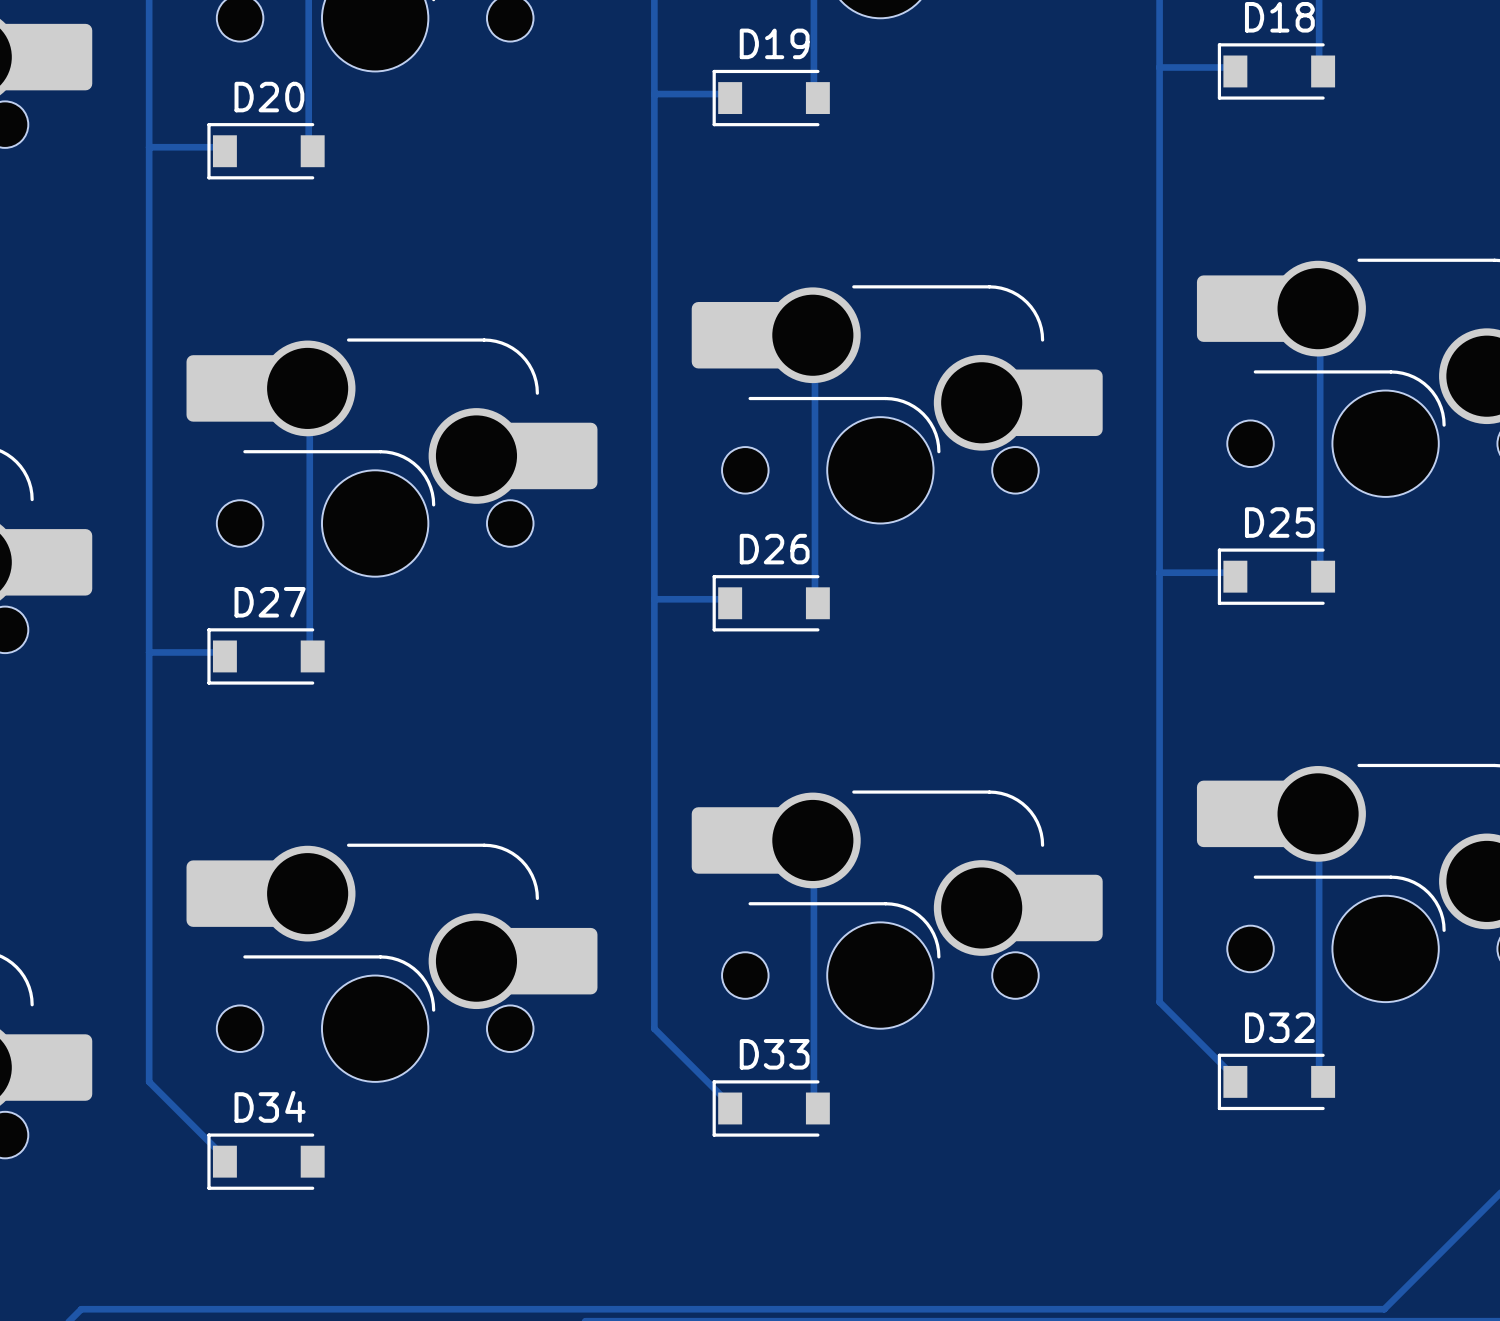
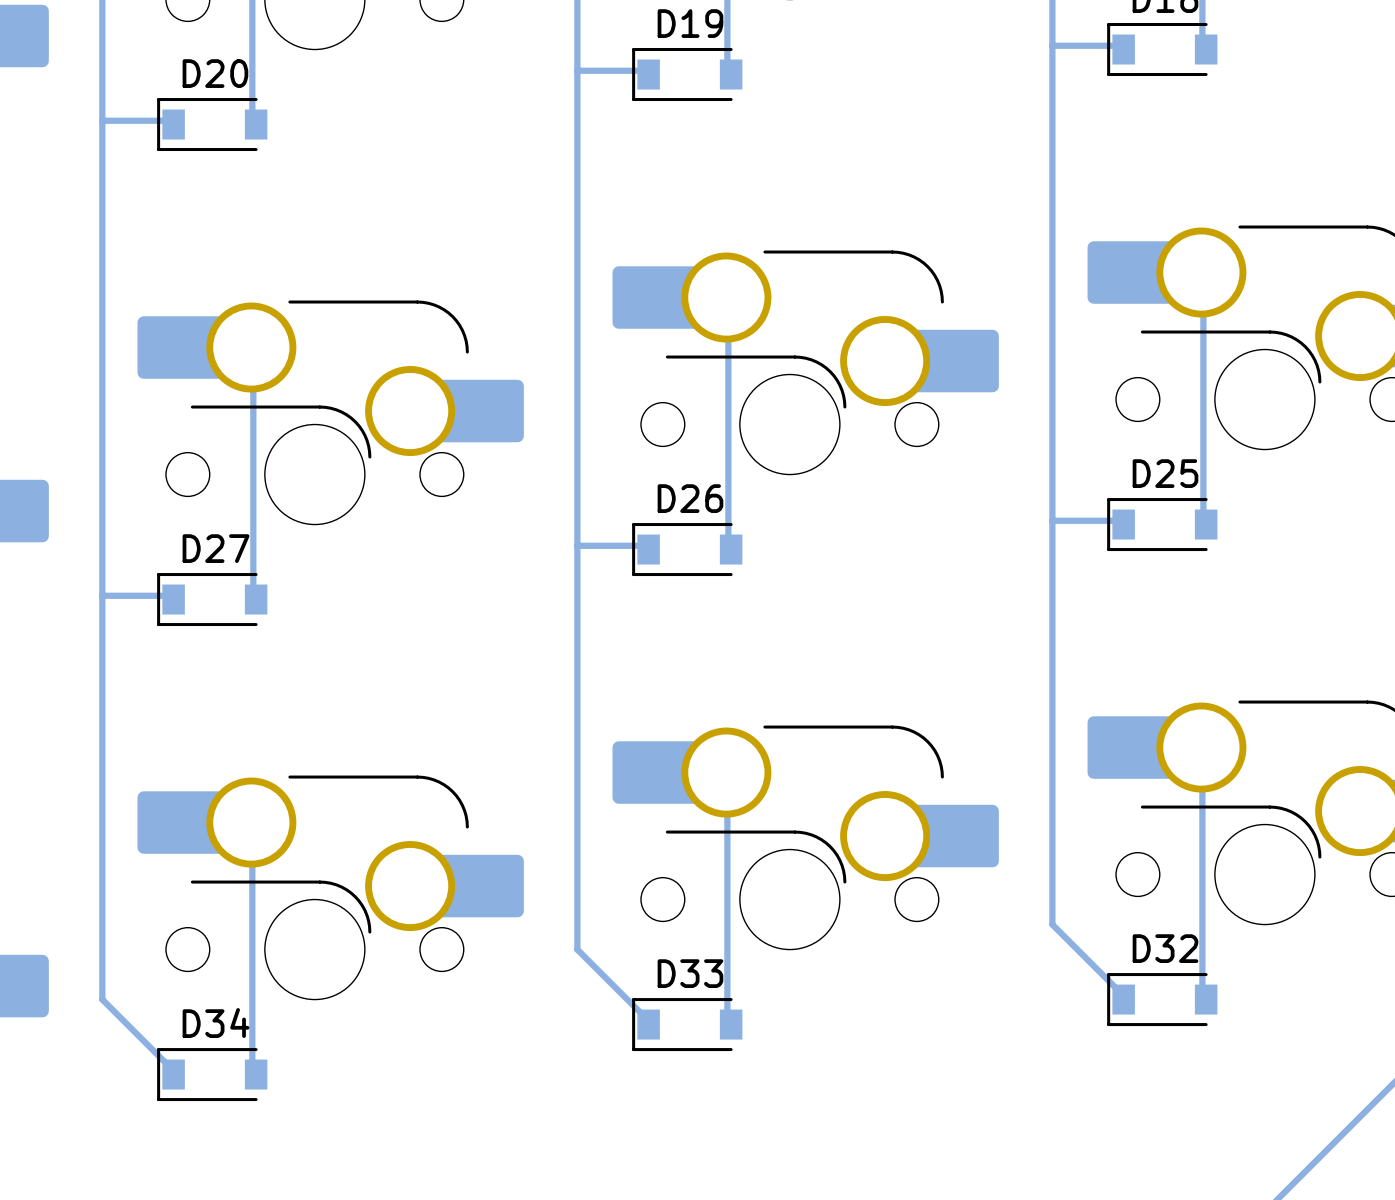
track: none -> (252, 825) (252, 1073)

